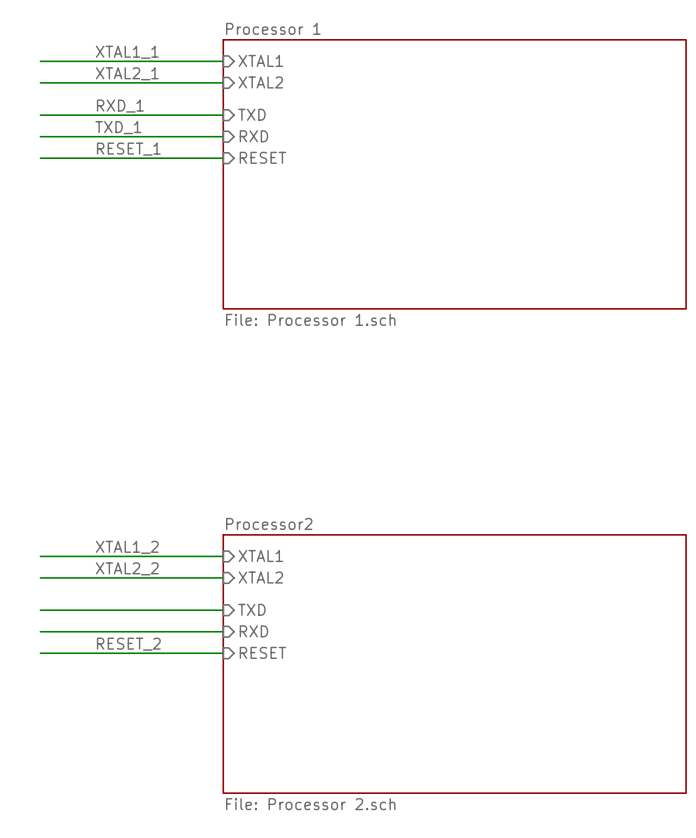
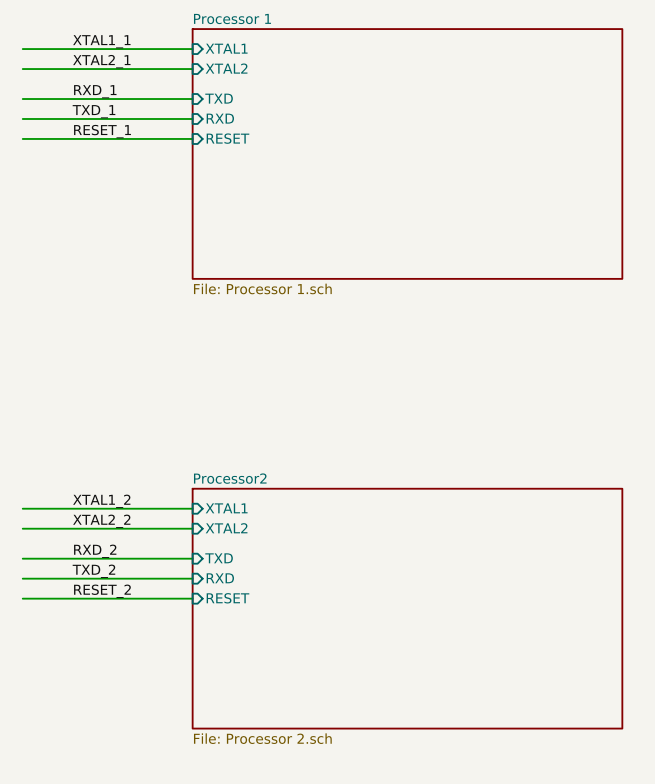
label: none -> RXD_2 (95, 551)
label: none -> TXD_2 (93, 571)

